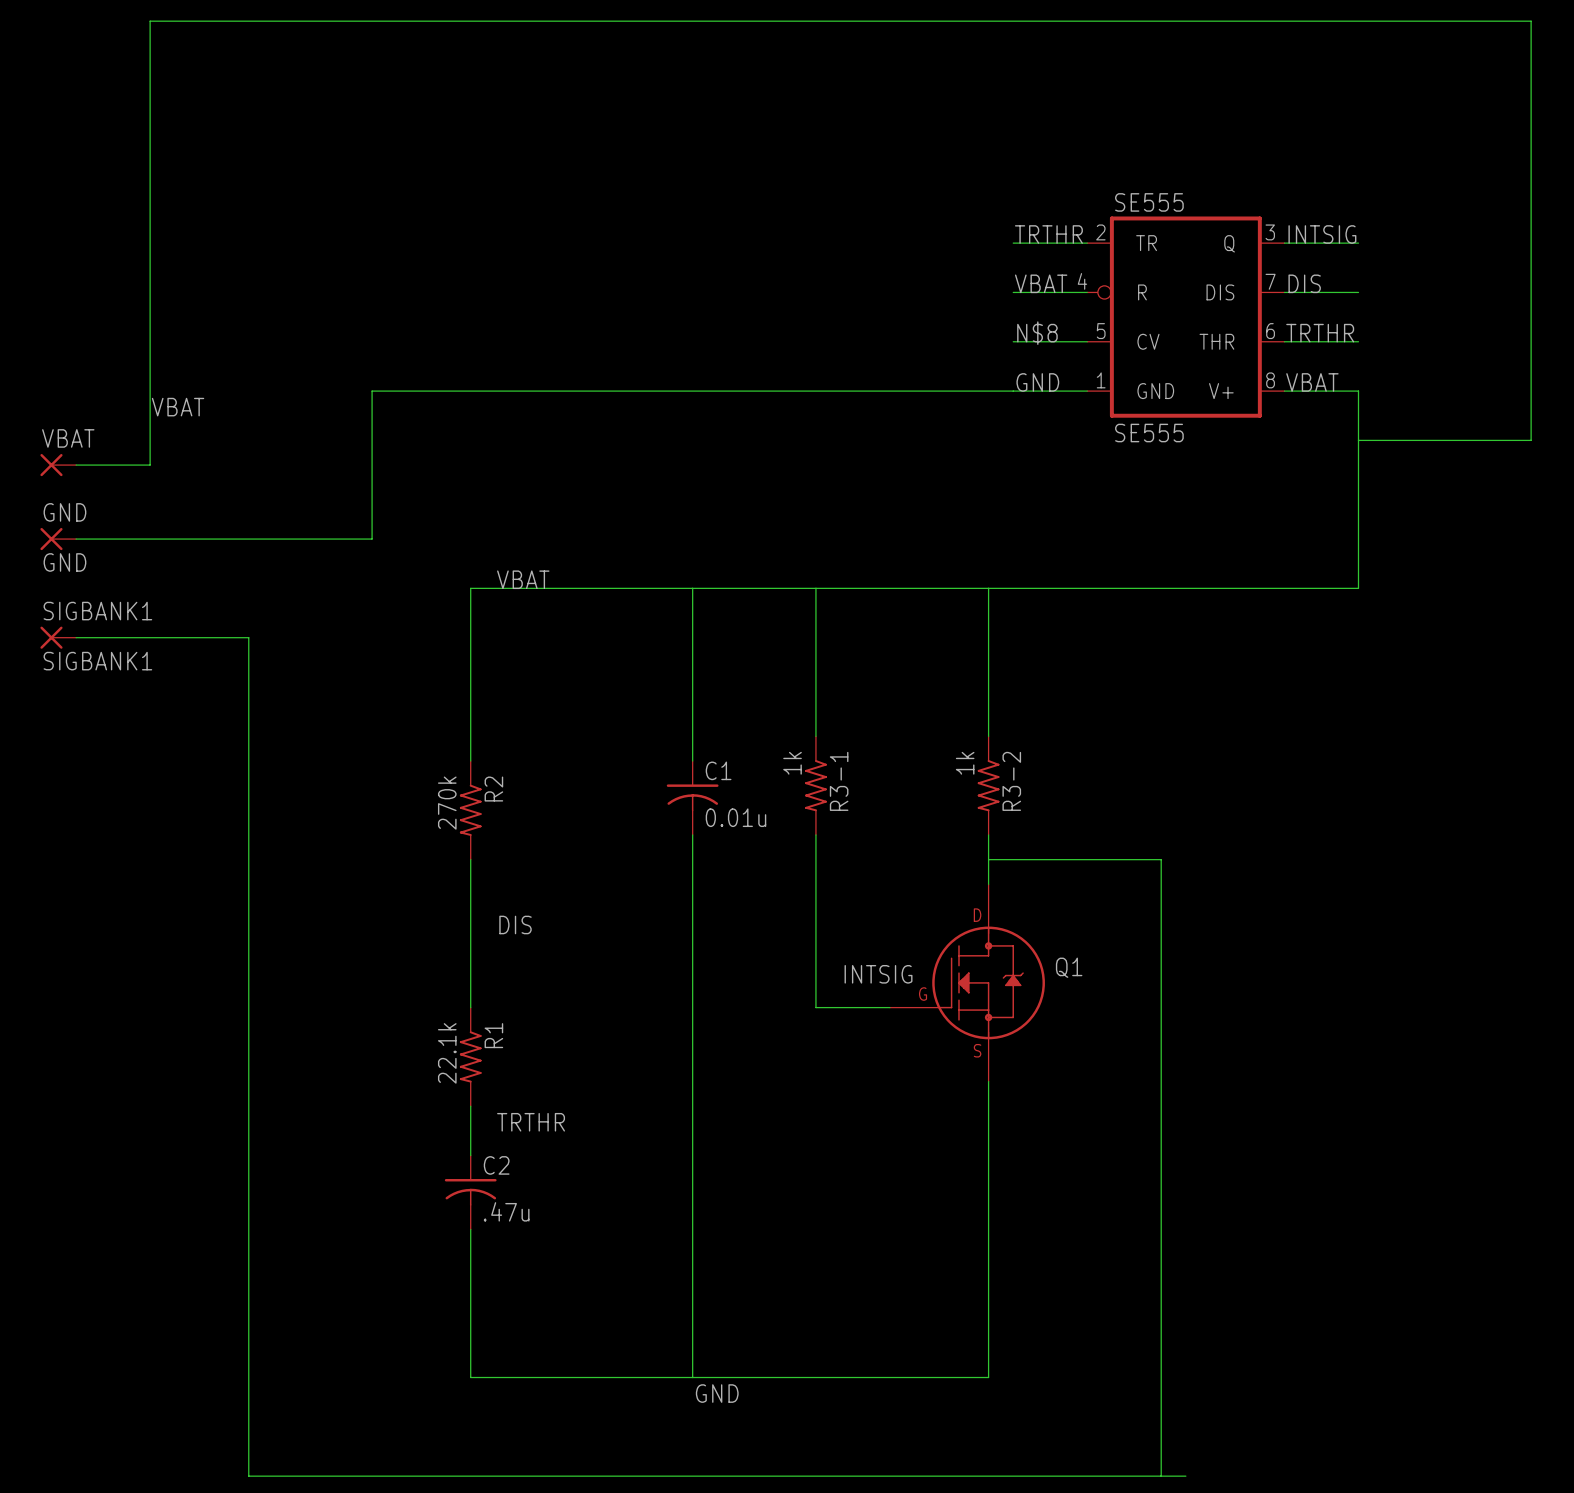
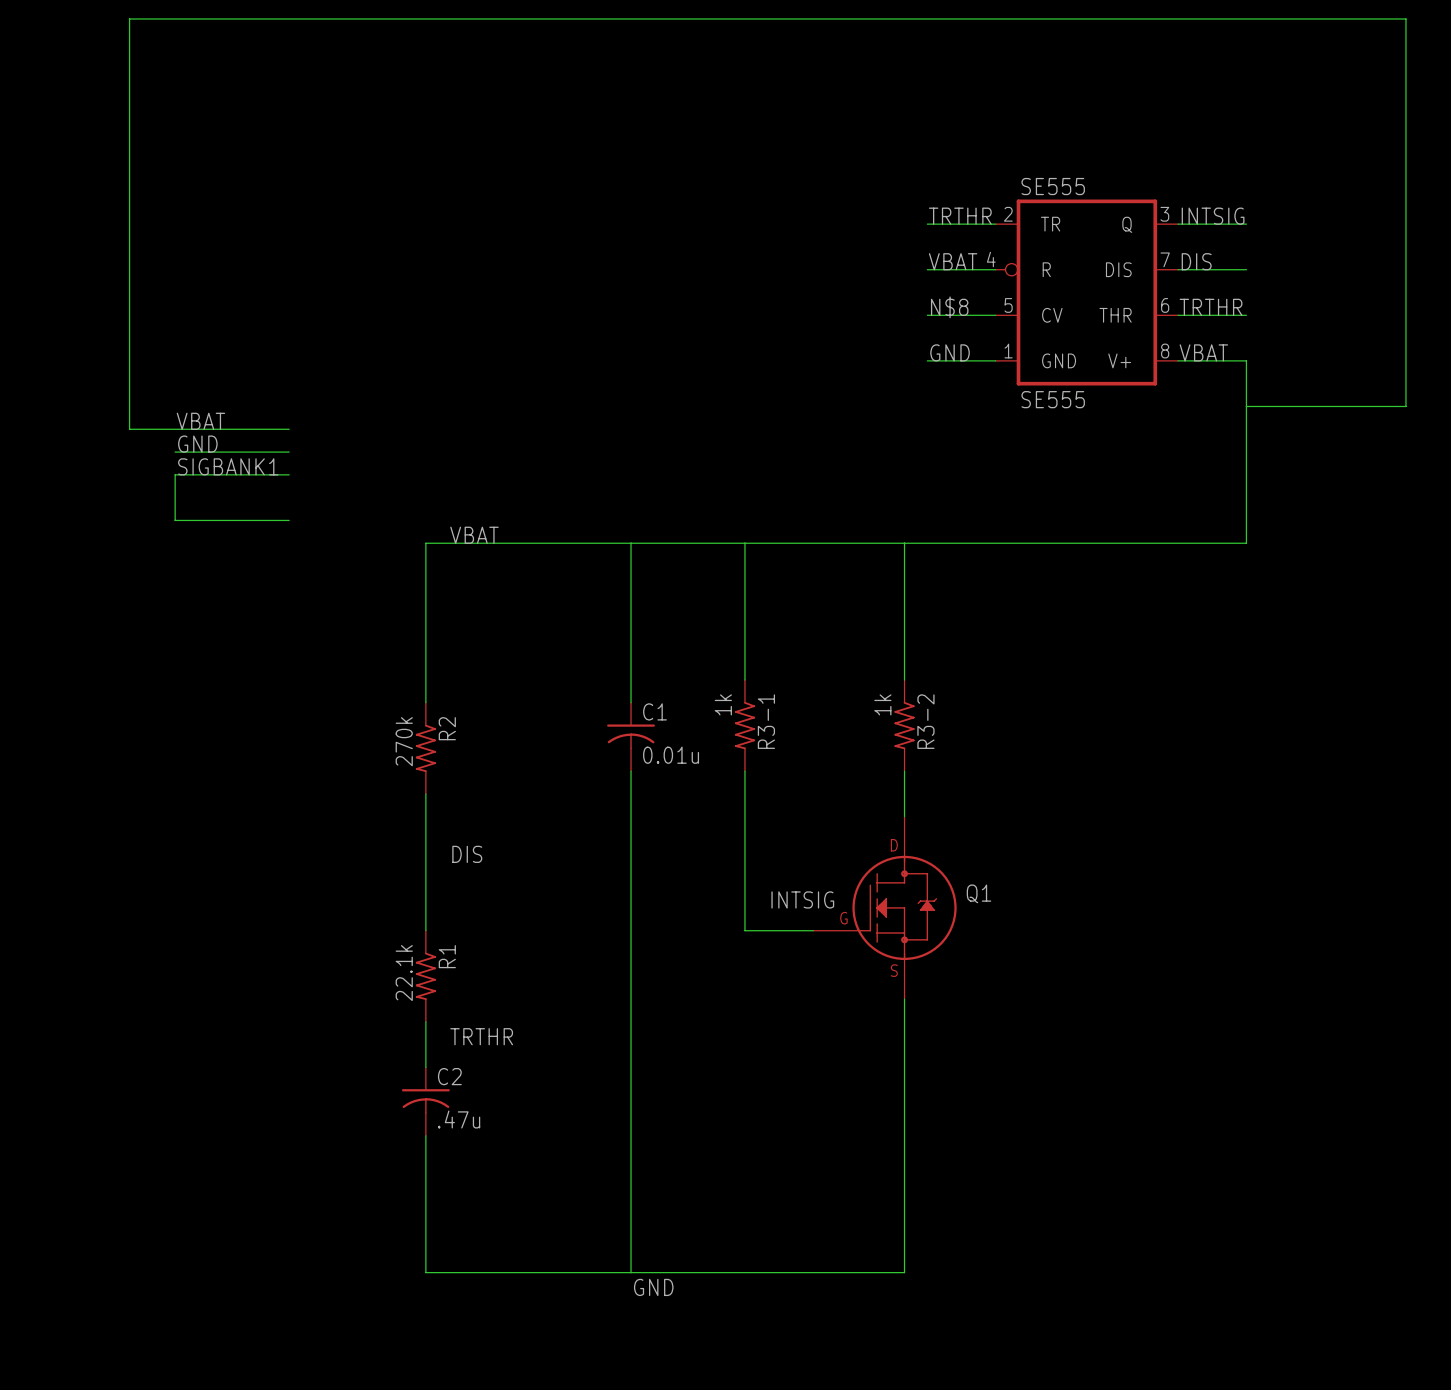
wire: (1013, 391) (372, 391) (372, 539) (76, 539) -> none
label position: VBAT (178, 407) -> VBAT (200, 421)
VBAT: (58, 465) -> none
wire: (76, 465) (150, 465) -> (289, 429) (129, 429)
label: none -> GND (197, 444)
wire: none -> (175, 452) (289, 452)
label: none -> SIGBANK1 (228, 466)
wire: none -> (289, 474) (175, 474) (175, 520) (289, 520)
GND: GND (58, 539) -> none
SIGBANK1: SIGBANK1 (58, 637) -> none
wire: (76, 637) (248, 637) (248, 1476) (1185, 1476) -> none
wire: (988, 859) (1161, 859) (1161, 1476) -> none

